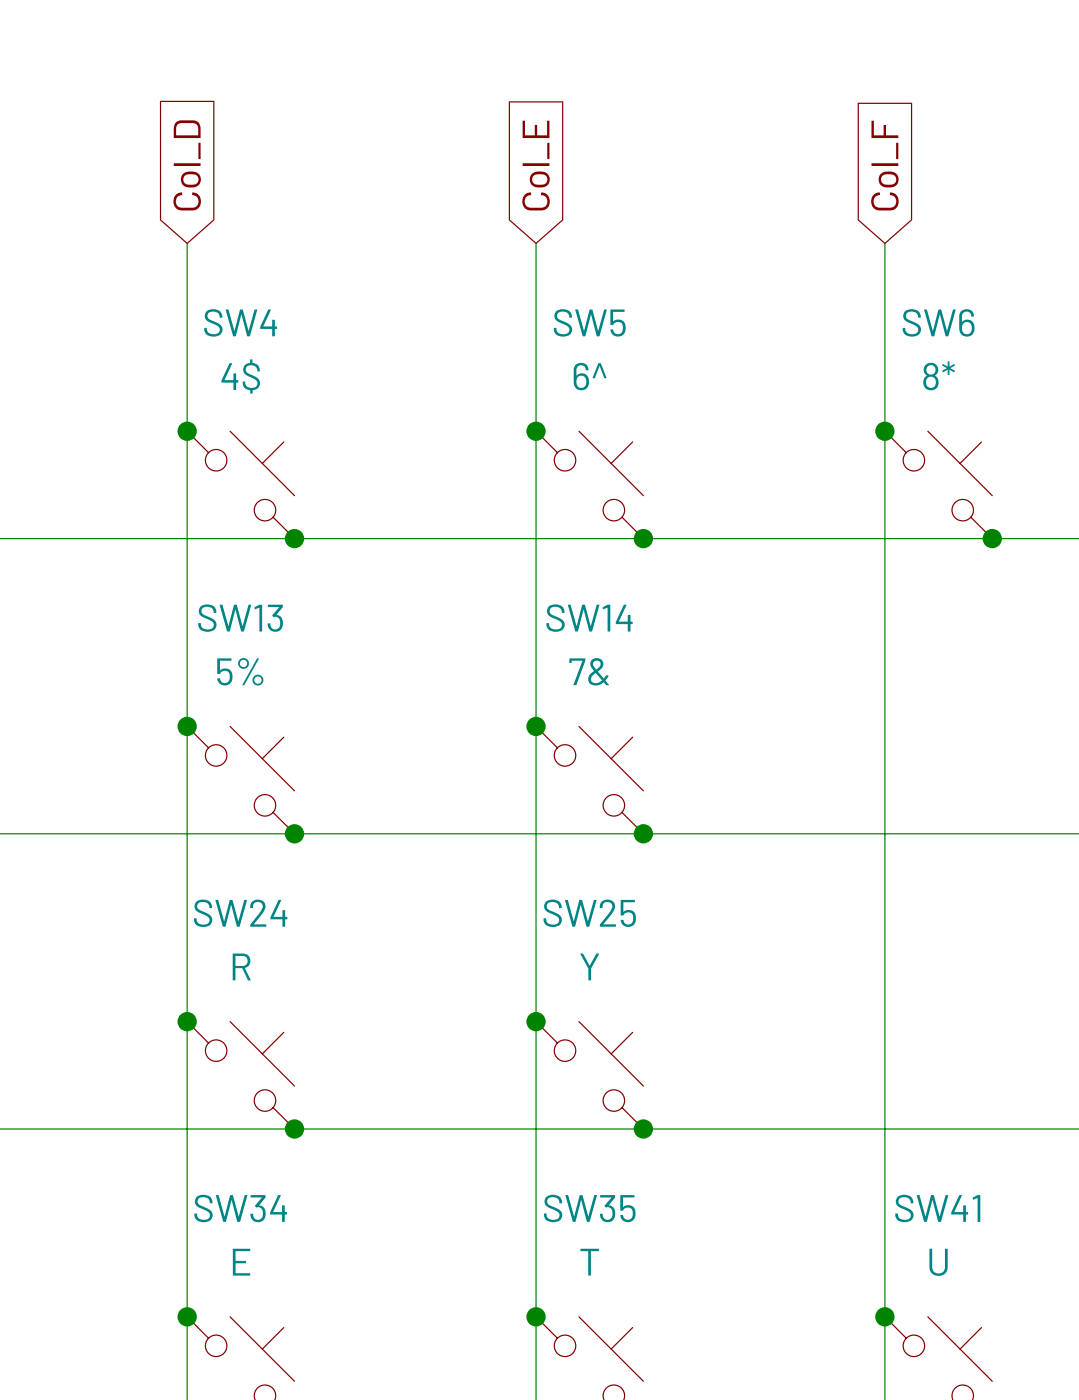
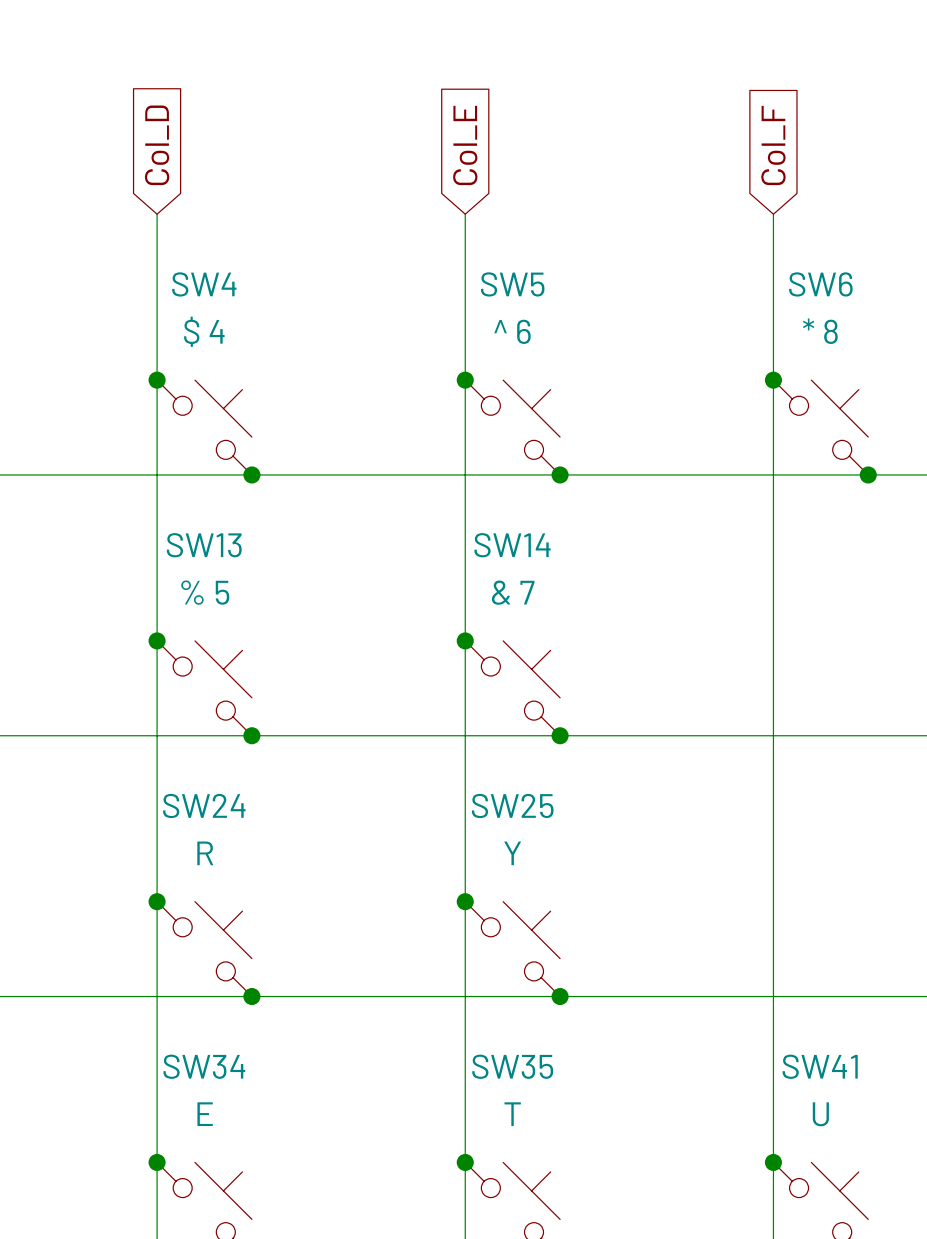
SW6 value: 8* (939, 375) -> * 8 (820, 331)
SW4 value: 4$ (240, 376) -> $ 4 (204, 331)
SW5 value: 6^ (590, 376) -> ^ 6 (512, 331)
SW13 value: 5% (240, 671) -> % 5 (205, 592)
SW14 value: 7& (589, 671) -> & 7 (513, 592)

